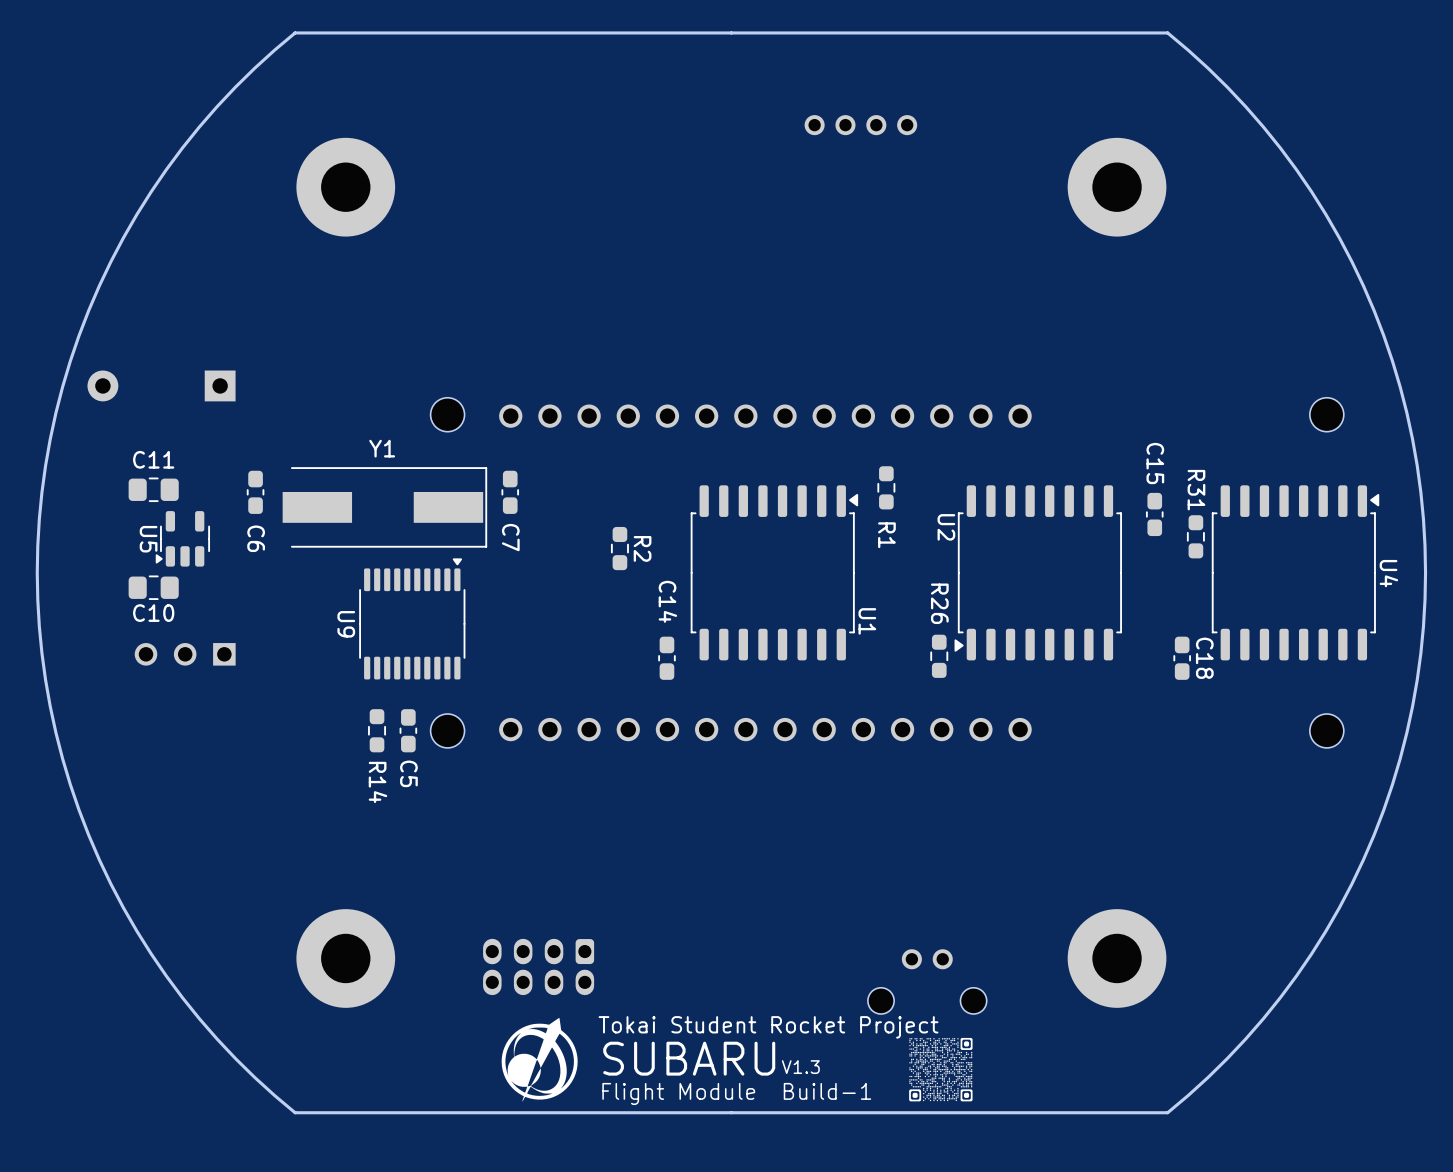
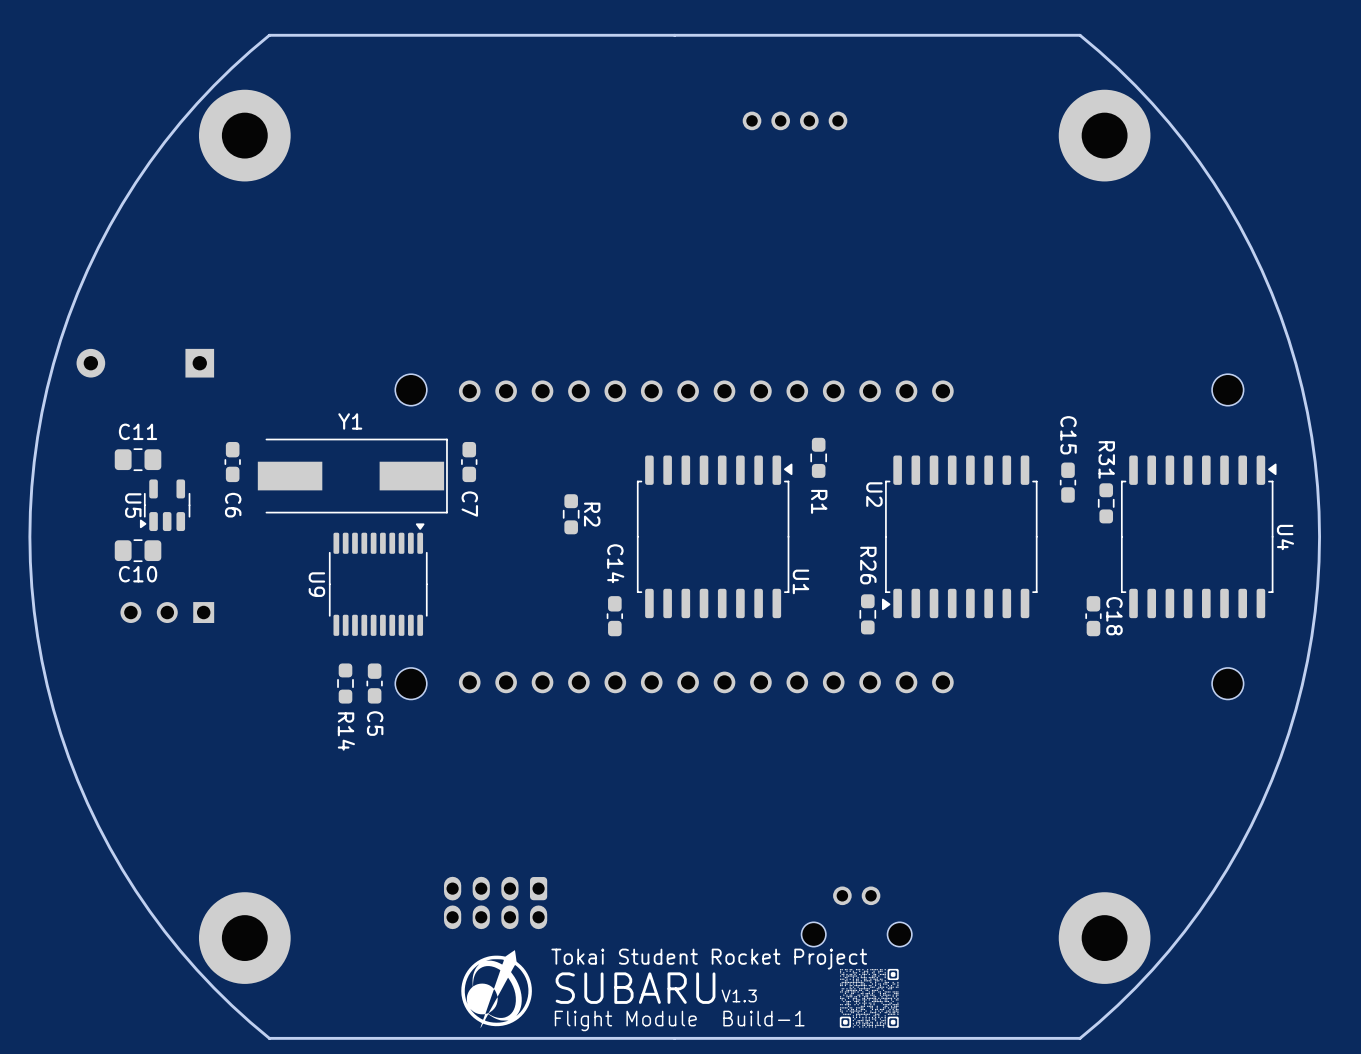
part position: (345, 187) -> (244, 135)
part position: (1117, 187) -> (1104, 135)
part position: (345, 958) -> (244, 938)
part position: (1117, 958) -> (1104, 938)

